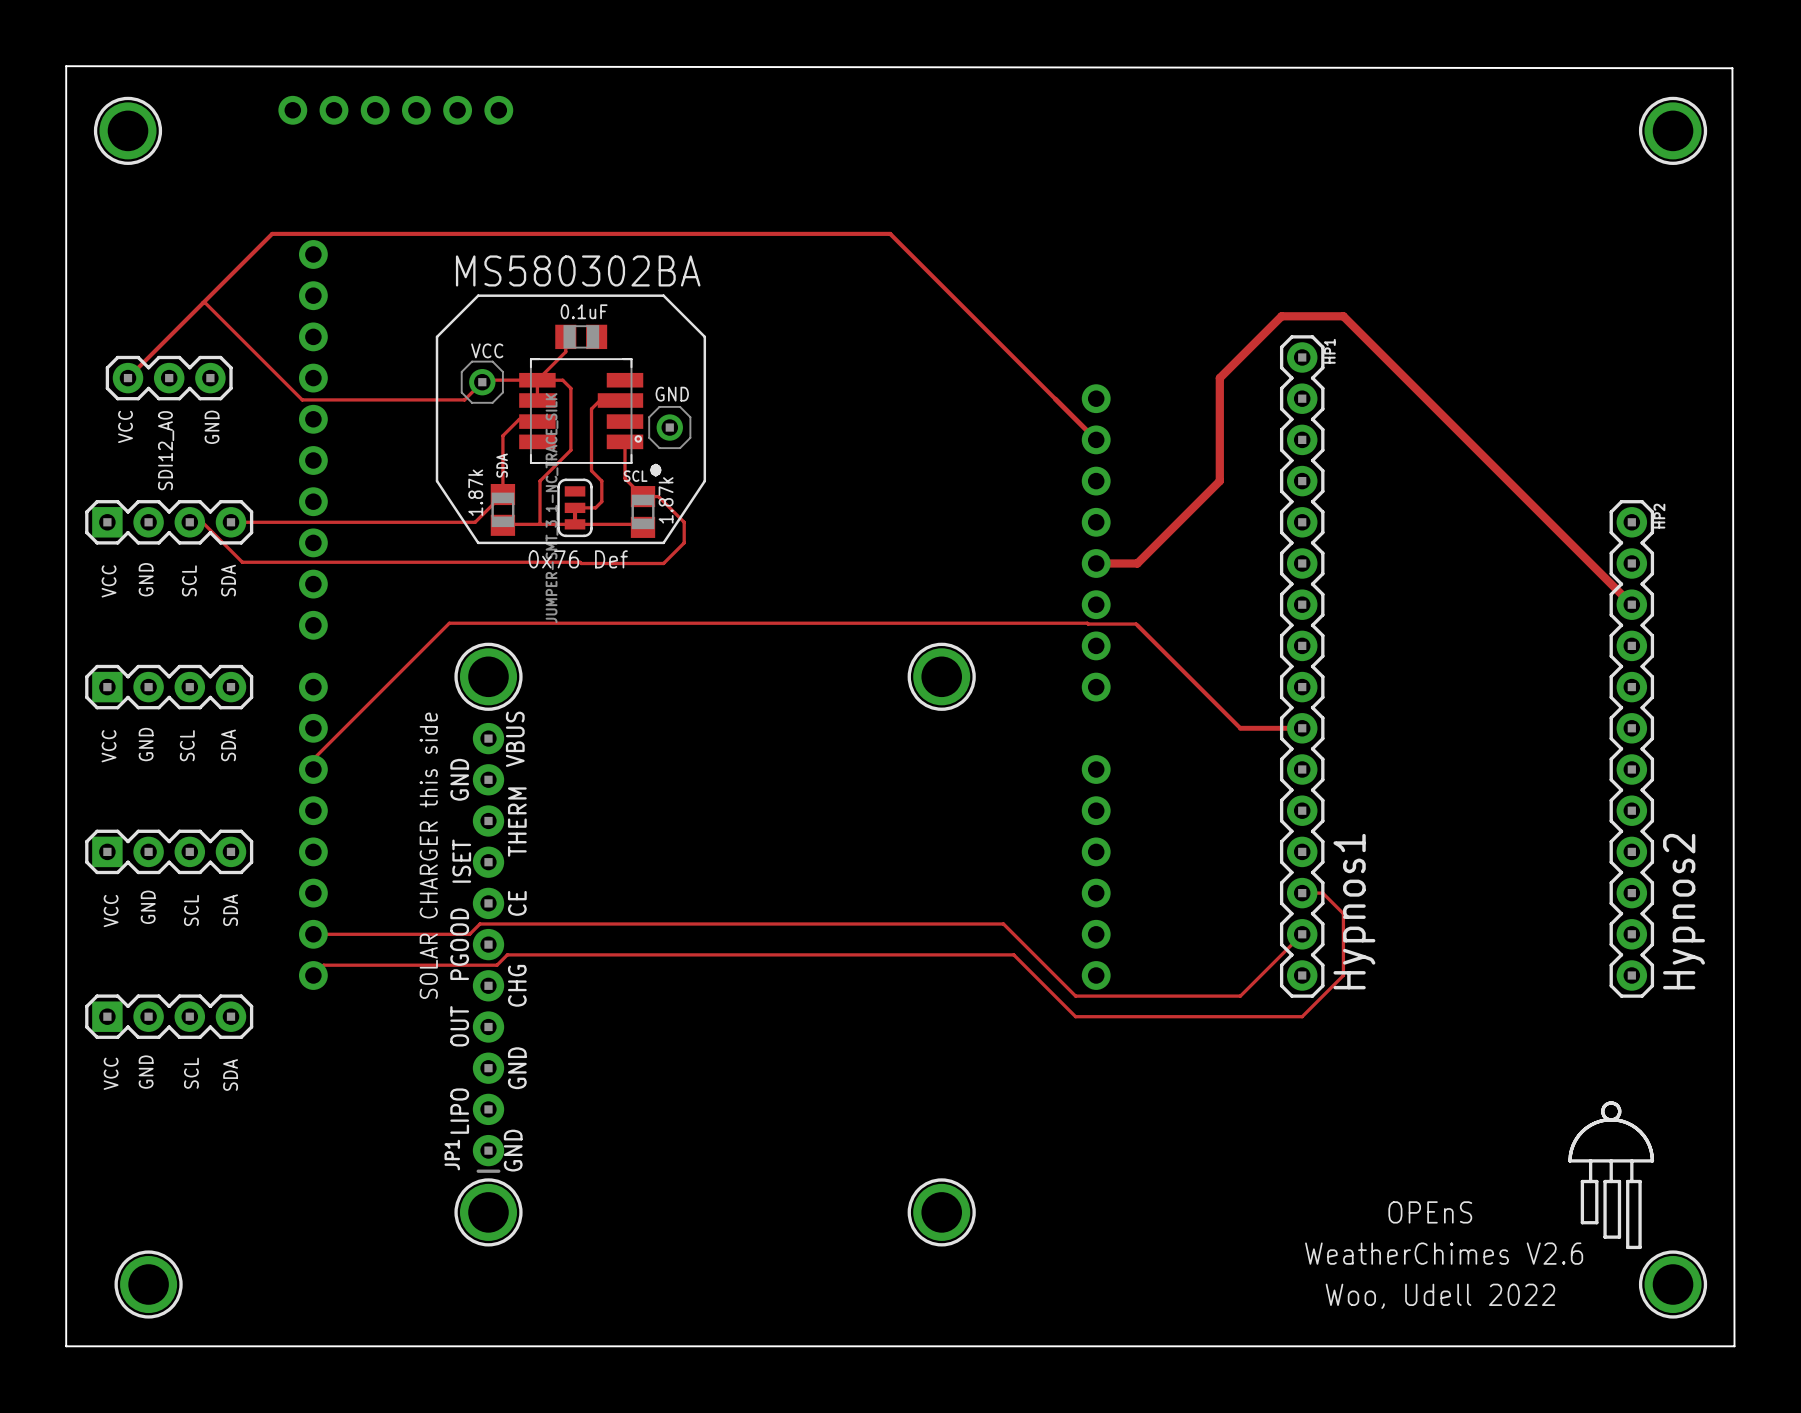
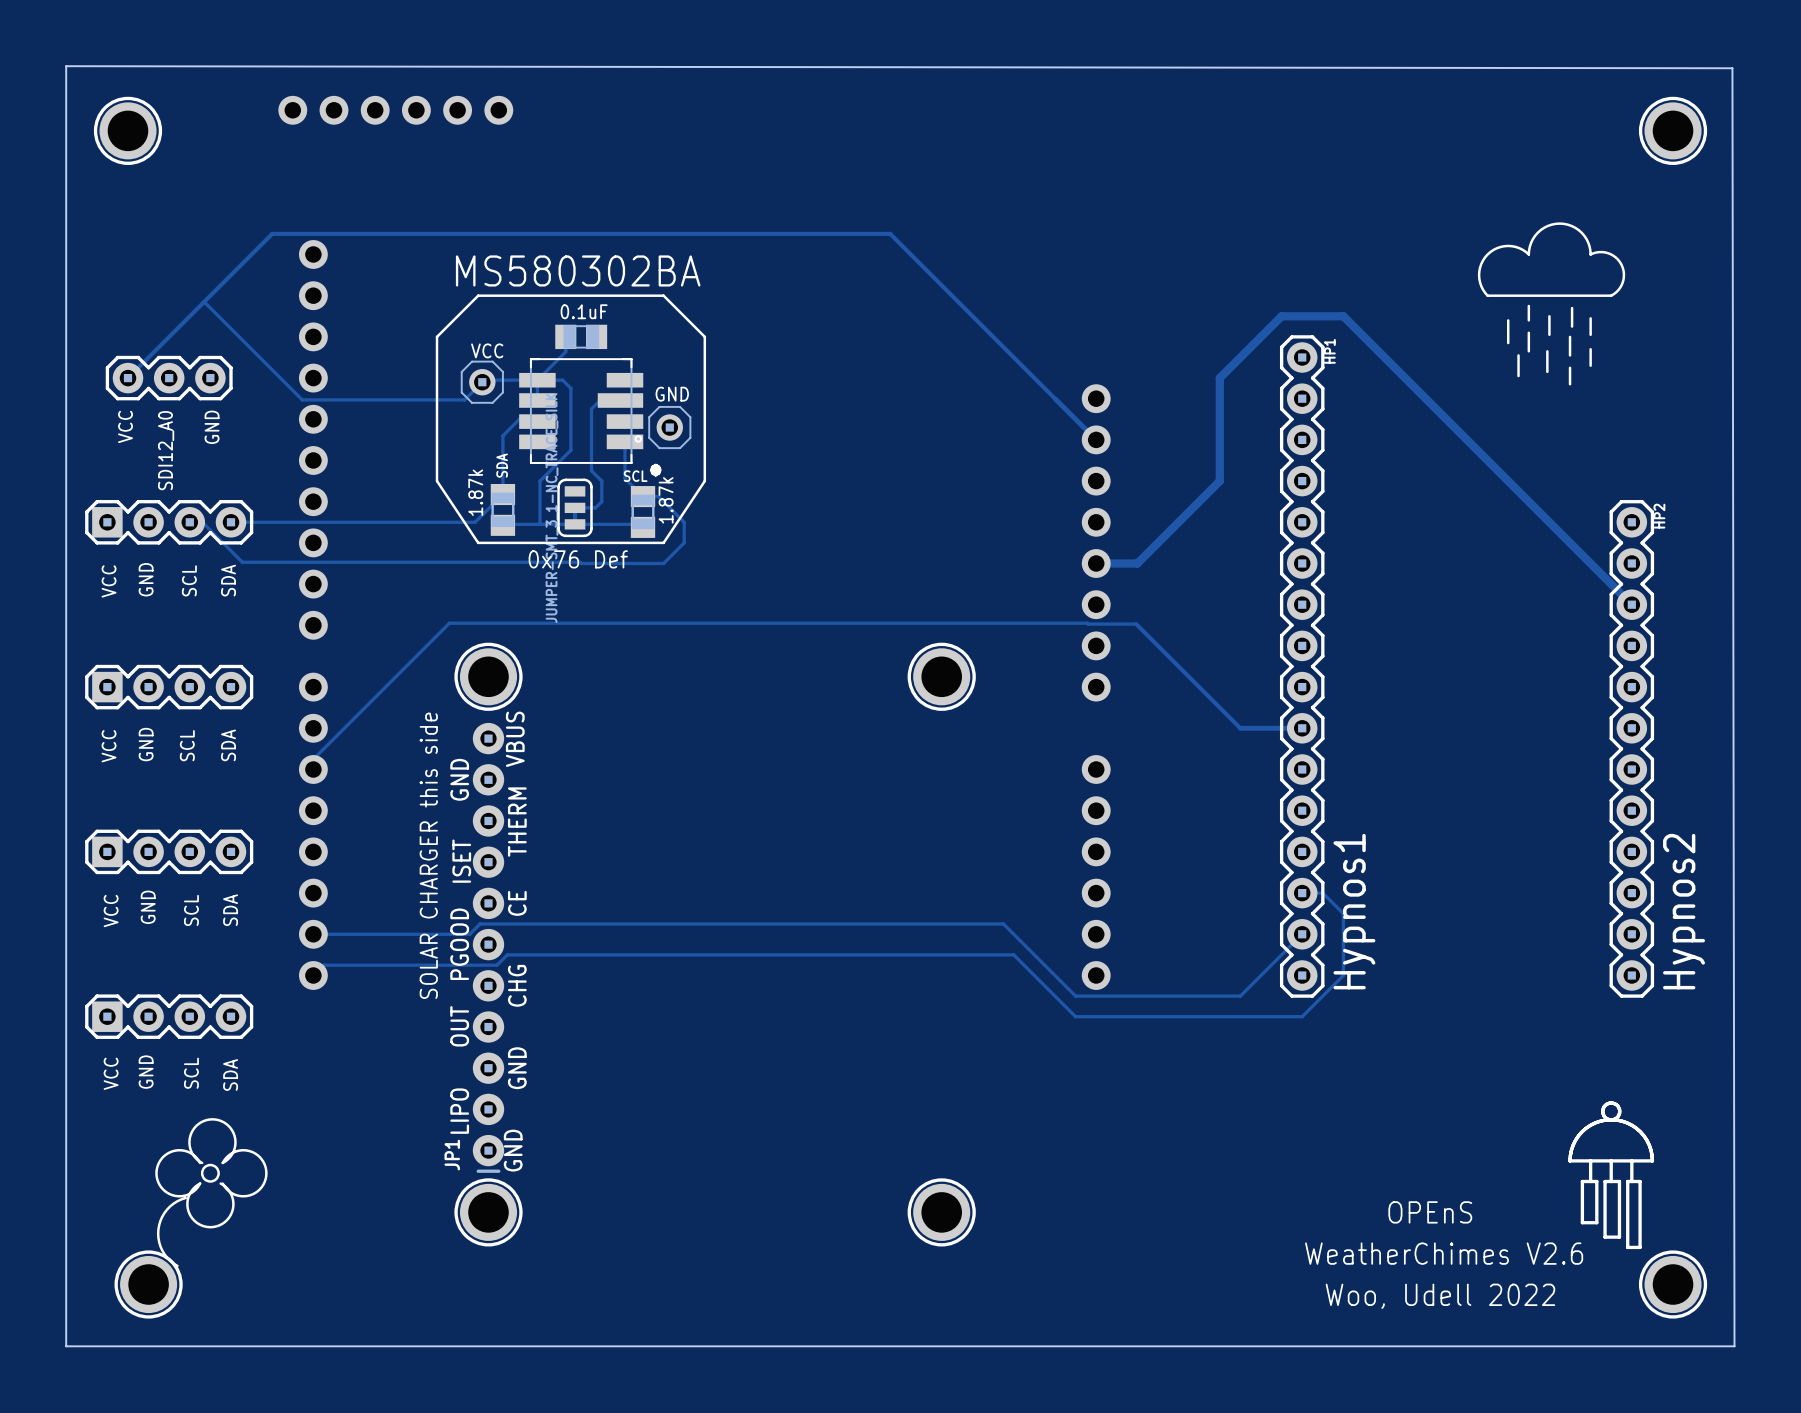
line: none -> (1528, 254) (1532, 239) (1540, 229) (1551, 224) (1567, 224) (1575, 227) (1584, 235) (1589, 246) (1590, 254) (1605, 252) (1618, 259) (1623, 270) (1622, 282) (1618, 290) (1611, 295) (1487, 295) (1481, 286) (1479, 275) (1481, 263) (1487, 254) (1497, 248) (1508, 245) (1519, 248) (1528, 254)
line: none -> (1528, 305) (1528, 320)
line: none -> (1572, 308) (1572, 326)
line: none -> (1549, 316) (1549, 334)
line: none -> (1590, 318) (1590, 334)
line: none -> (1508, 320) (1508, 343)
line: none -> (1528, 332) (1528, 351)
line: none -> (1570, 336) (1570, 355)
line: none -> (1590, 349) (1590, 365)
line: none -> (1547, 351) (1547, 371)
line: none -> (1518, 355) (1518, 376)
line: none -> (1570, 367) (1570, 384)
line: none -> (200, 1162) (189, 1152) (175, 1150) (162, 1157) (158, 1164) (156, 1173) (158, 1181) (162, 1189) (175, 1195) (184, 1195) (187, 1194) (189, 1193) (200, 1183) (191, 1191) (189, 1193) (188, 1196) (187, 1202) (189, 1213) (199, 1224) (207, 1227) (218, 1225) (226, 1220) (231, 1213) (233, 1205) (232, 1196) (227, 1188) (220, 1183)
line: none -> (202, 1162) (195, 1157) (190, 1150) (189, 1141) (191, 1132) (196, 1125) (203, 1120) (215, 1119) (223, 1122) (233, 1132) (235, 1144) (234, 1150) (232, 1152) (231, 1155) (222, 1162) (232, 1152) (235, 1151) (238, 1150) (247, 1150) (259, 1157) (264, 1164) (266, 1173) (264, 1181) (259, 1189) (247, 1195) (232, 1193) (222, 1183)
drawing: none -> [200, 1163, 220, 1183]
line: none -> (185, 1197) (177, 1201) (167, 1209) (162, 1216) (158, 1229) (158, 1237) (162, 1250) (167, 1257) (177, 1265)

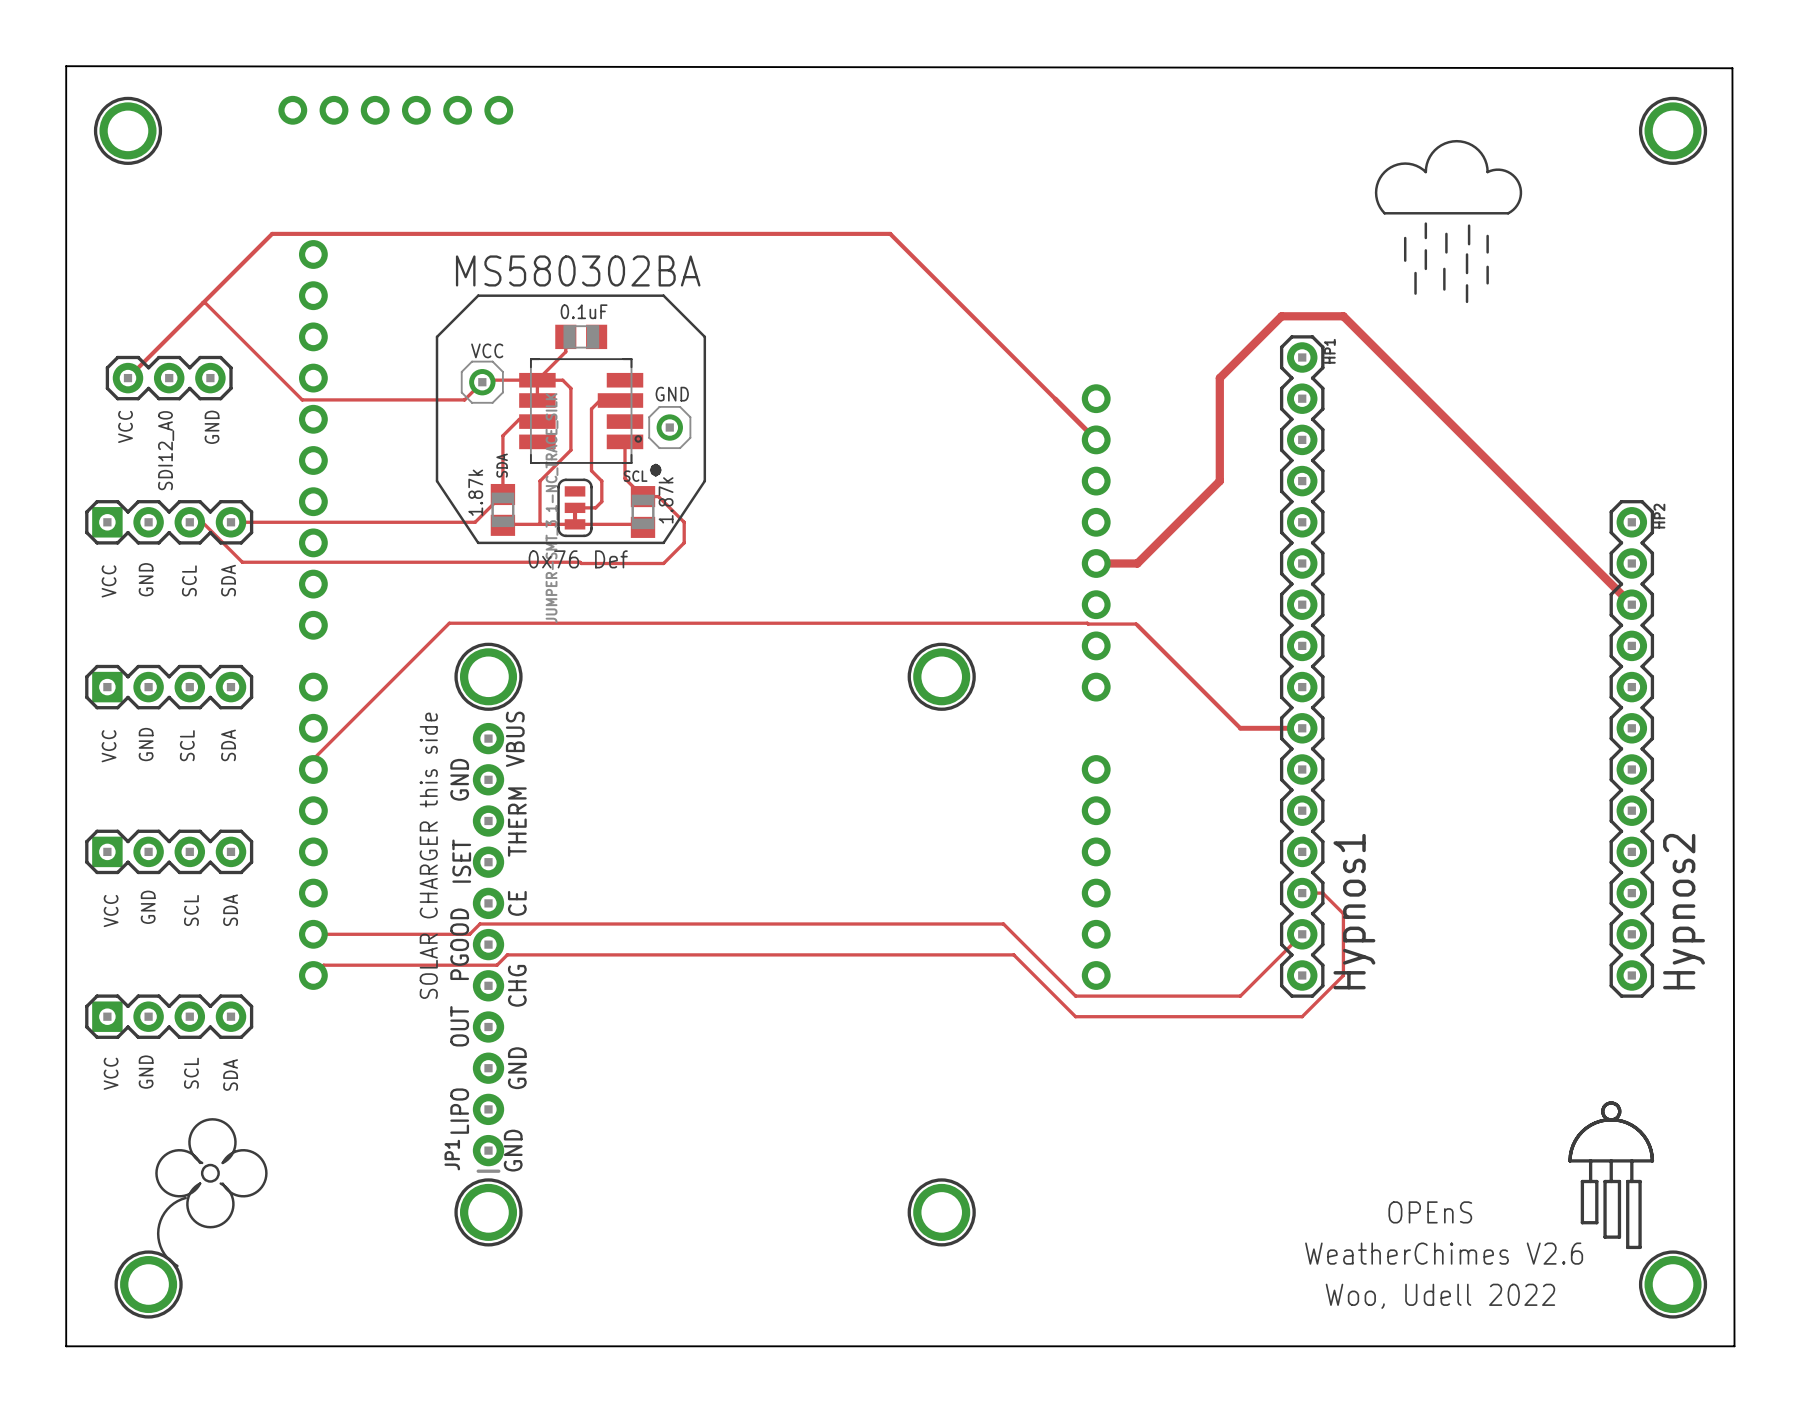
line: (1528, 254) (1532, 239) (1540, 229) (1551, 224) (1567, 224) (1575, 227) (1584, 235) (1589, 246) (1590, 254) (1605, 252) (1618, 259) (1623, 270) (1622, 282) (1618, 290) (1611, 295) (1487, 295) (1481, 286) (1479, 275) (1481, 263) (1487, 254) (1497, 248) (1508, 245) (1519, 248) (1528, 254) -> (1425, 172) (1429, 156) (1437, 147) (1448, 142) (1464, 142) (1472, 145) (1481, 153) (1486, 164) (1487, 172) (1502, 170) (1515, 177) (1520, 188) (1519, 199) (1515, 207) (1508, 213) (1384, 213) (1378, 203) (1376, 192) (1378, 181) (1384, 172) (1394, 165) (1405, 163) (1416, 165) (1425, 172)
line: (1528, 305) (1528, 320) -> (1425, 223) (1425, 238)
line: (1572, 308) (1572, 326) -> (1469, 225) (1469, 244)
line: (1549, 316) (1549, 334) -> (1446, 233) (1446, 252)
line: (1590, 318) (1590, 334) -> (1487, 235) (1487, 252)
line: (1508, 320) (1508, 343) -> (1405, 238) (1405, 260)
line: (1528, 332) (1528, 351) -> (1425, 250) (1425, 268)
line: (1570, 336) (1570, 355) -> (1467, 254) (1467, 273)
line: (1590, 349) (1590, 365) -> (1487, 266) (1487, 283)
line: (1547, 351) (1547, 371) -> (1444, 268) (1444, 289)
line: (1518, 355) (1518, 376) -> (1415, 273) (1415, 293)
line: (1570, 367) (1570, 384) -> (1467, 285) (1467, 301)

